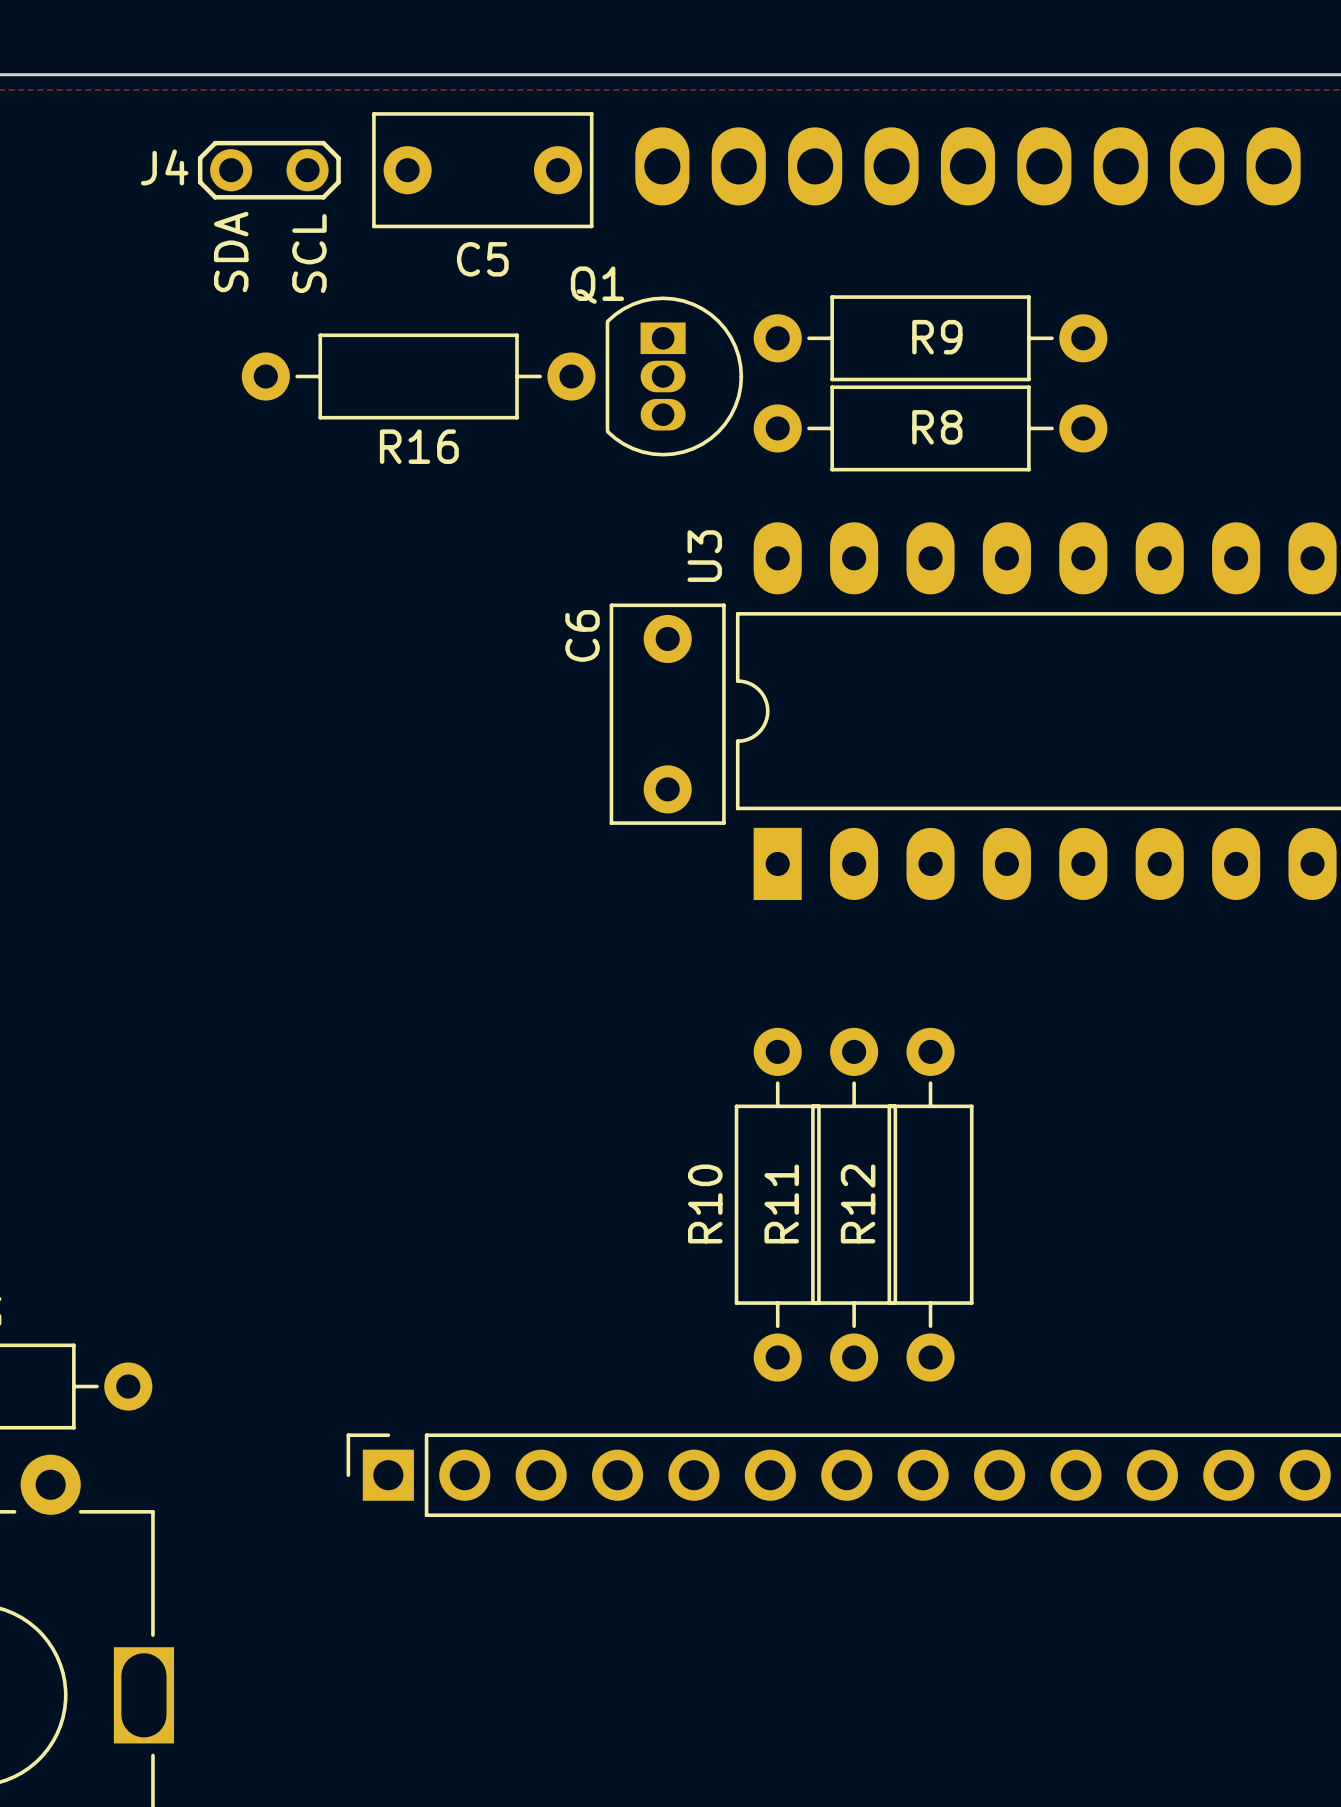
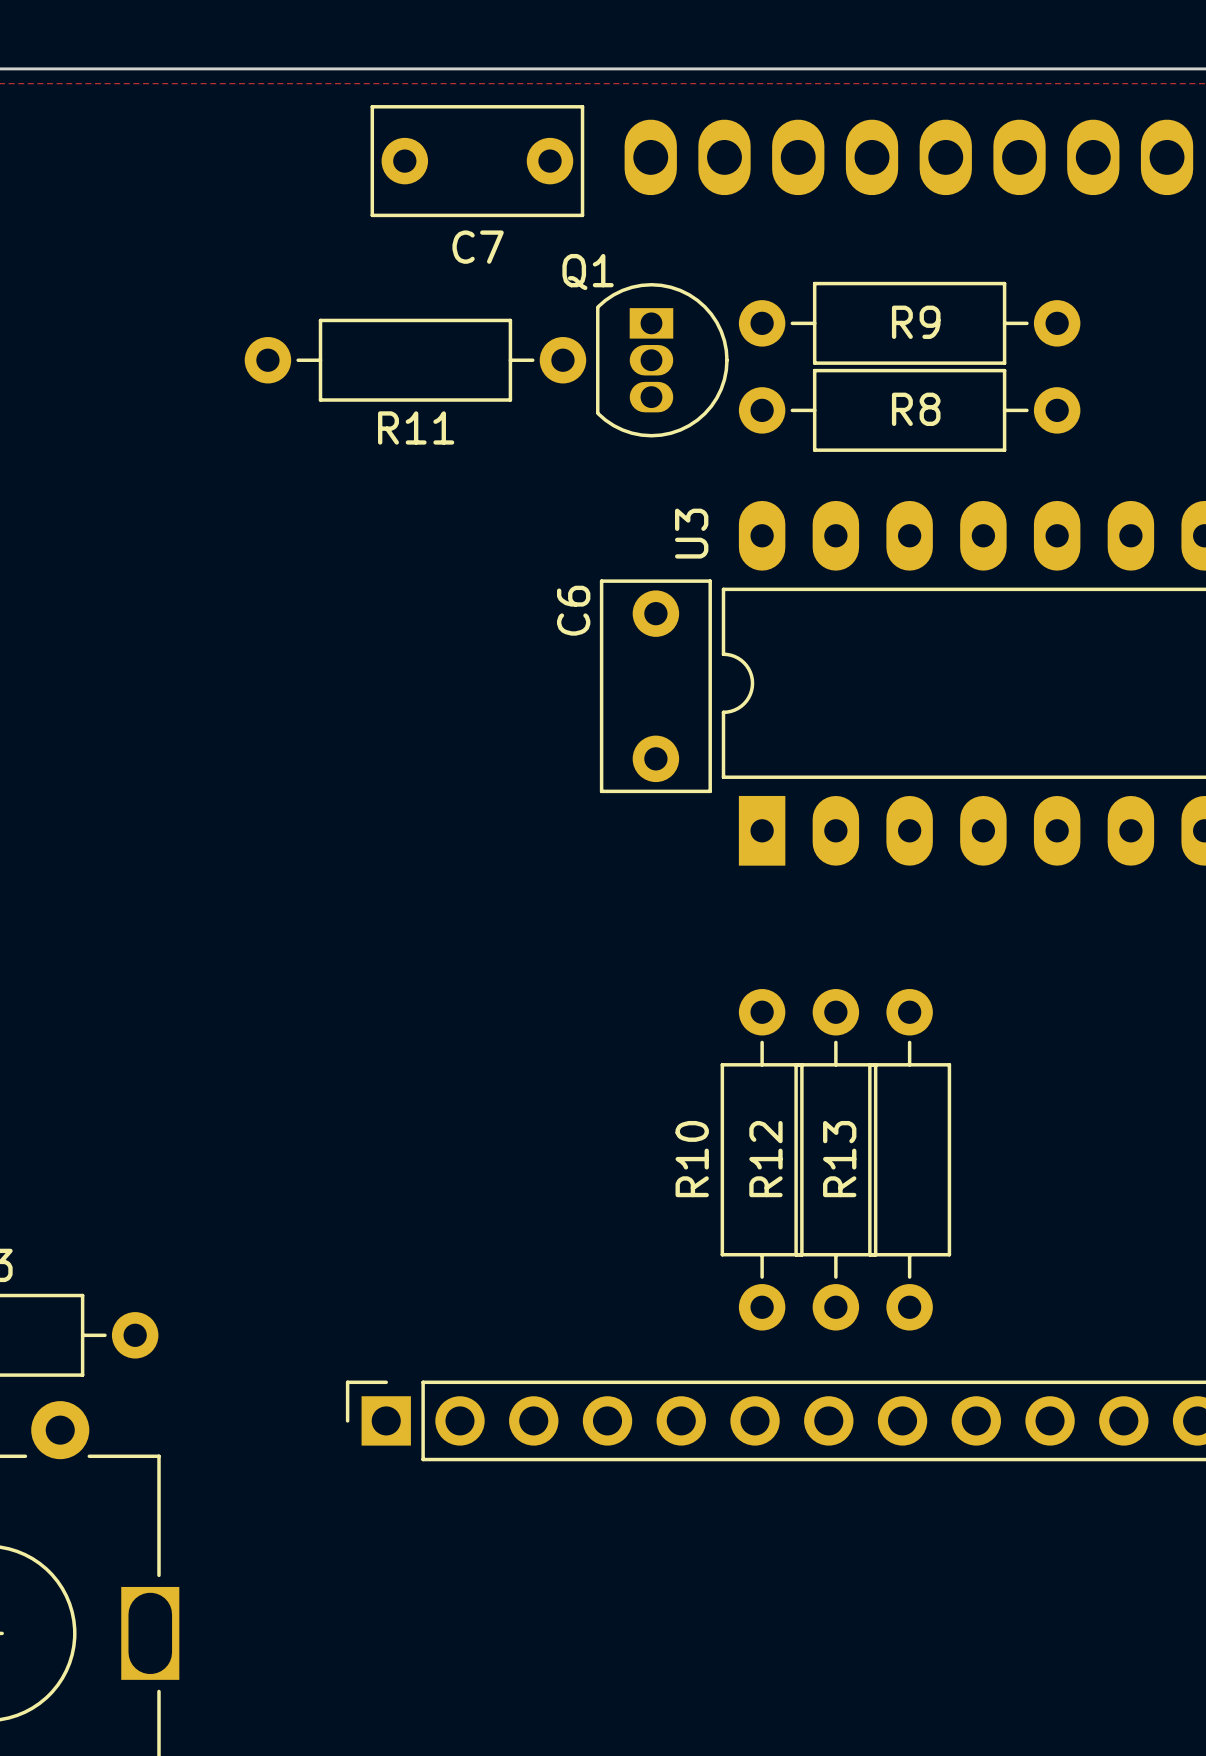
J4: (269, 170) -> none
text: SDA (231, 252) -> none
text: SCL (309, 253) -> none
C5 name: C5 (482, 259) -> C7 (478, 247)
R16 name: R16 (419, 446) -> R11 (416, 427)
R11 name: R11 (781, 1203) -> R12 (765, 1159)
R12 name: R12 (858, 1203) -> R13 (839, 1159)

